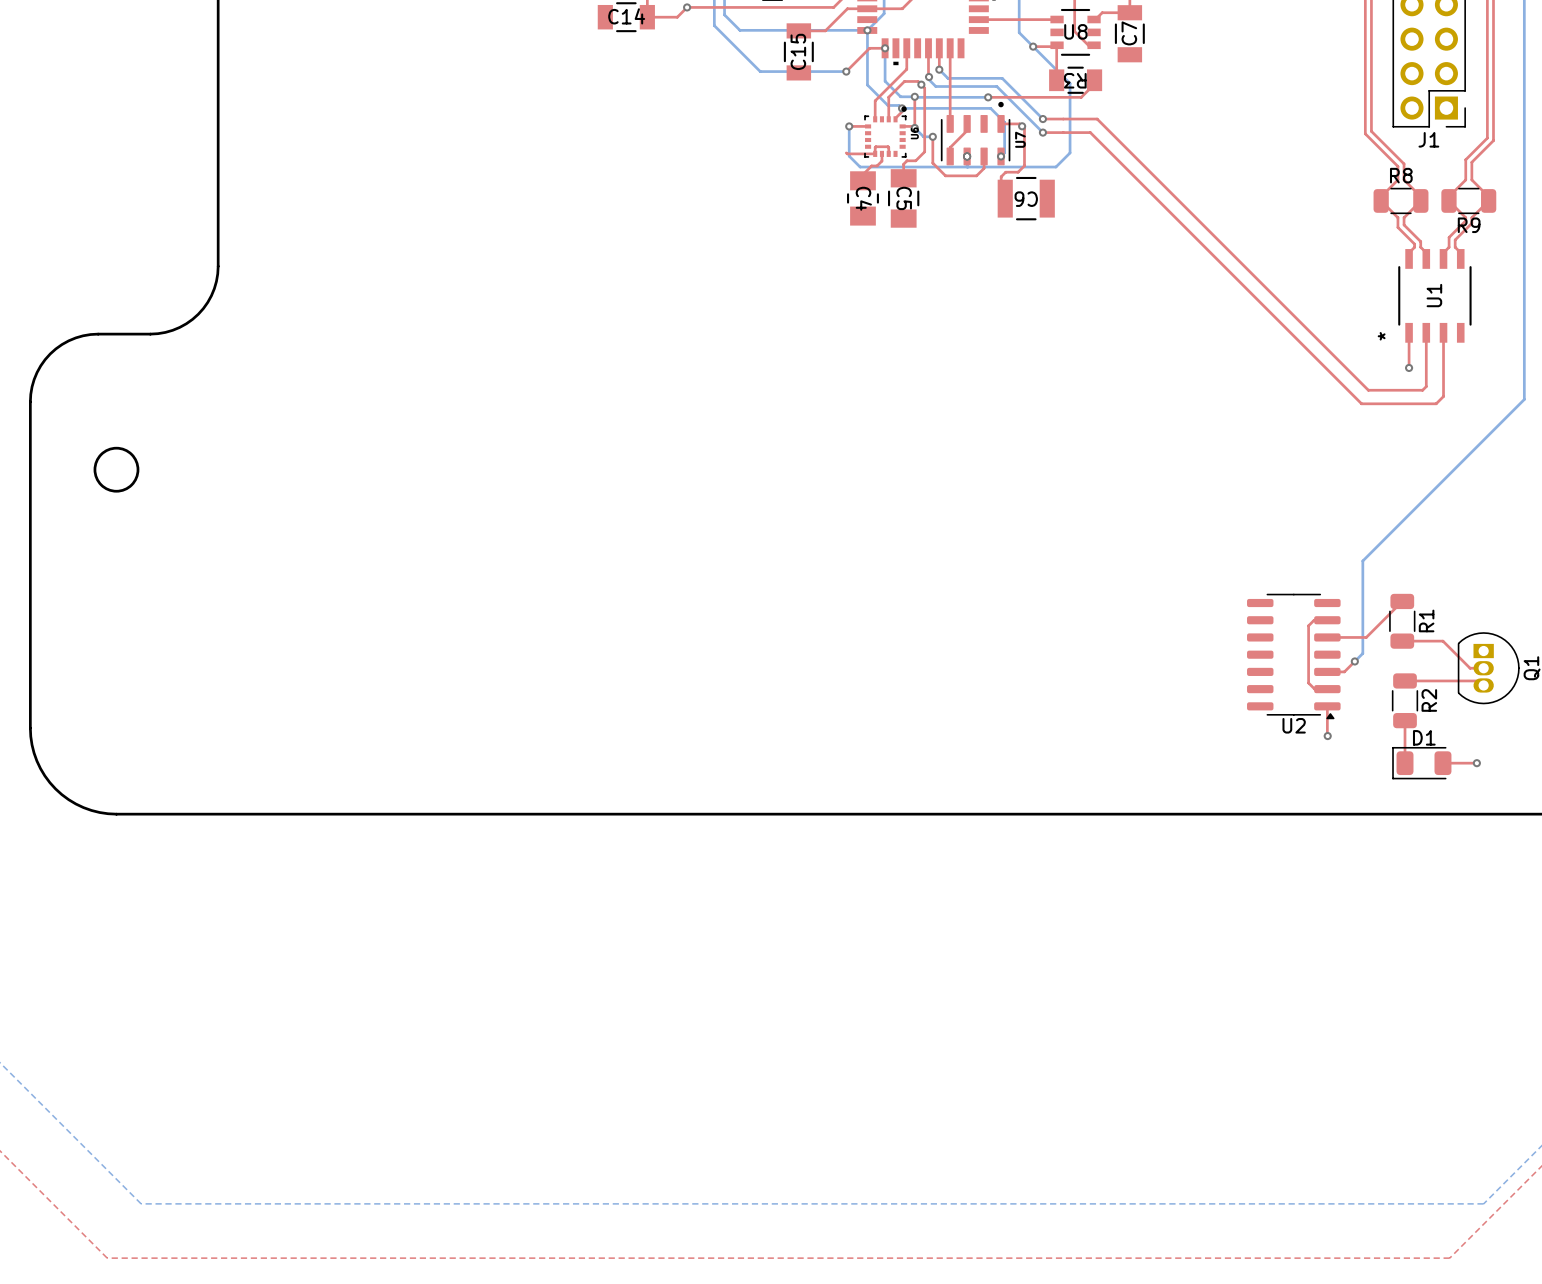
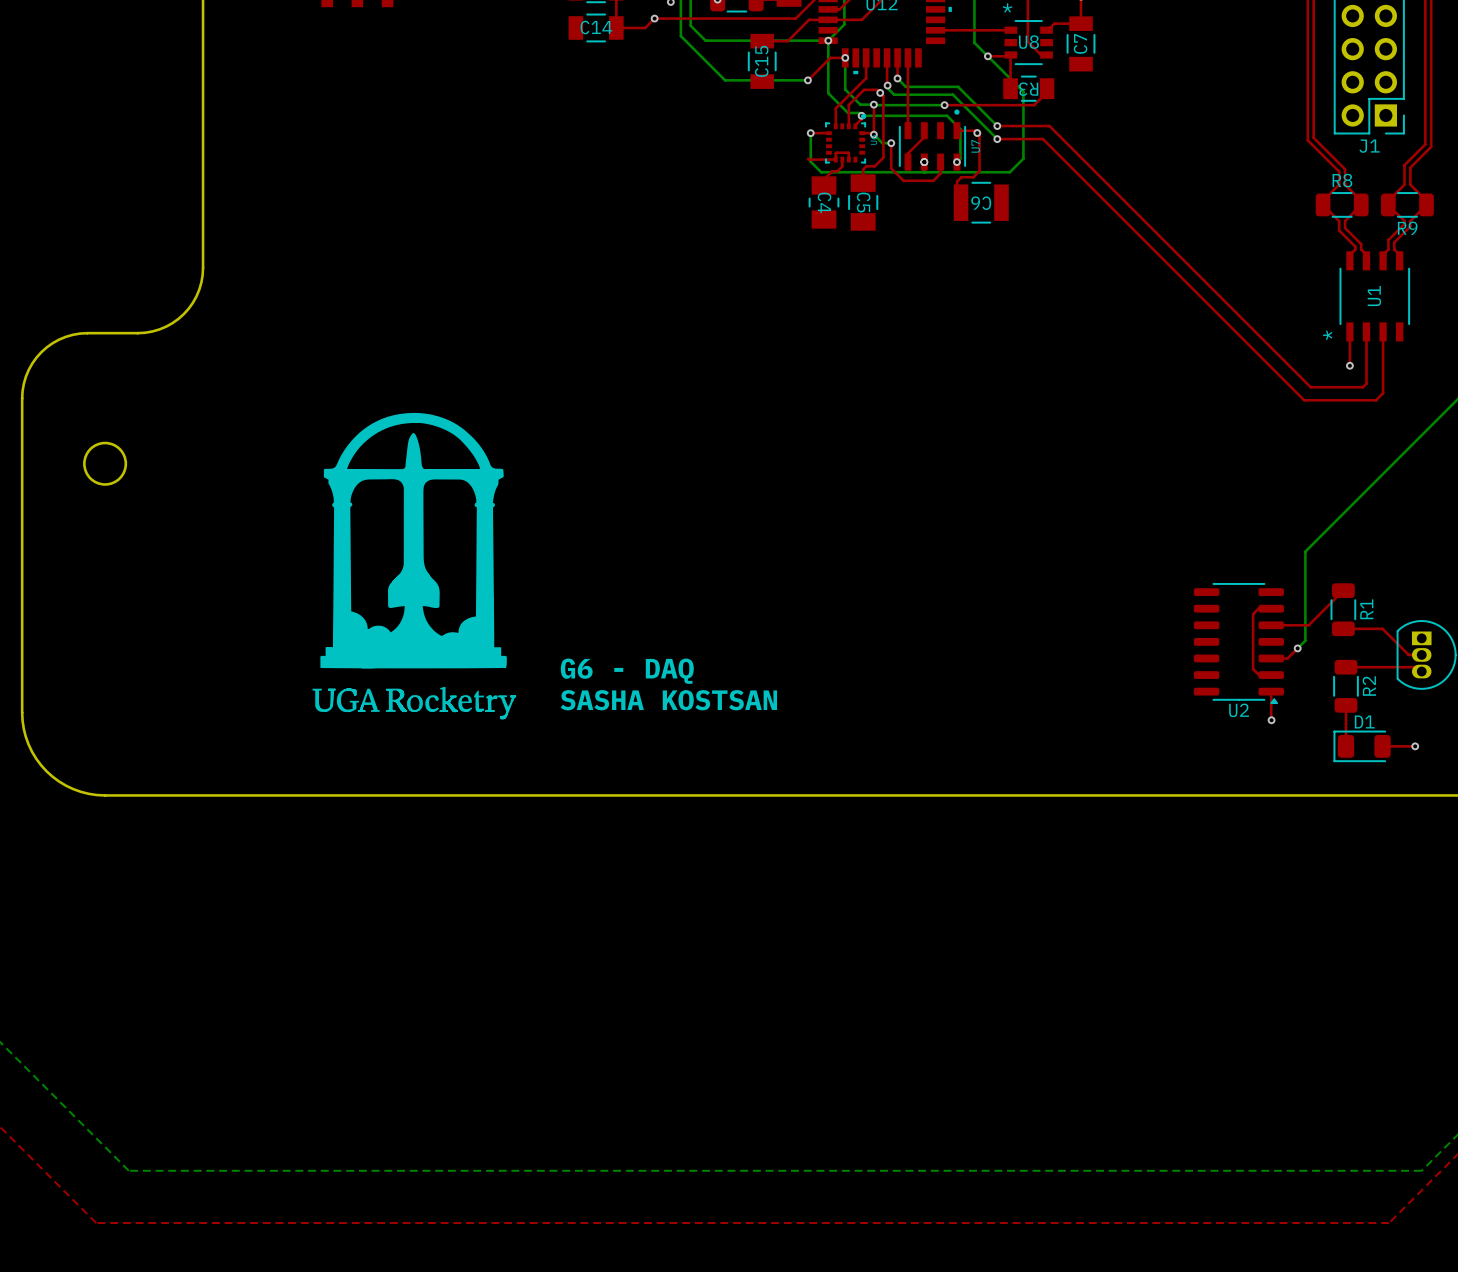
drawing: none -> [320, 412, 507, 669]
text: none -> G6 - DAQ (627, 671)
drawing: none -> [312, 686, 517, 720]
text: none -> SASHA KOSTSAN (668, 700)

